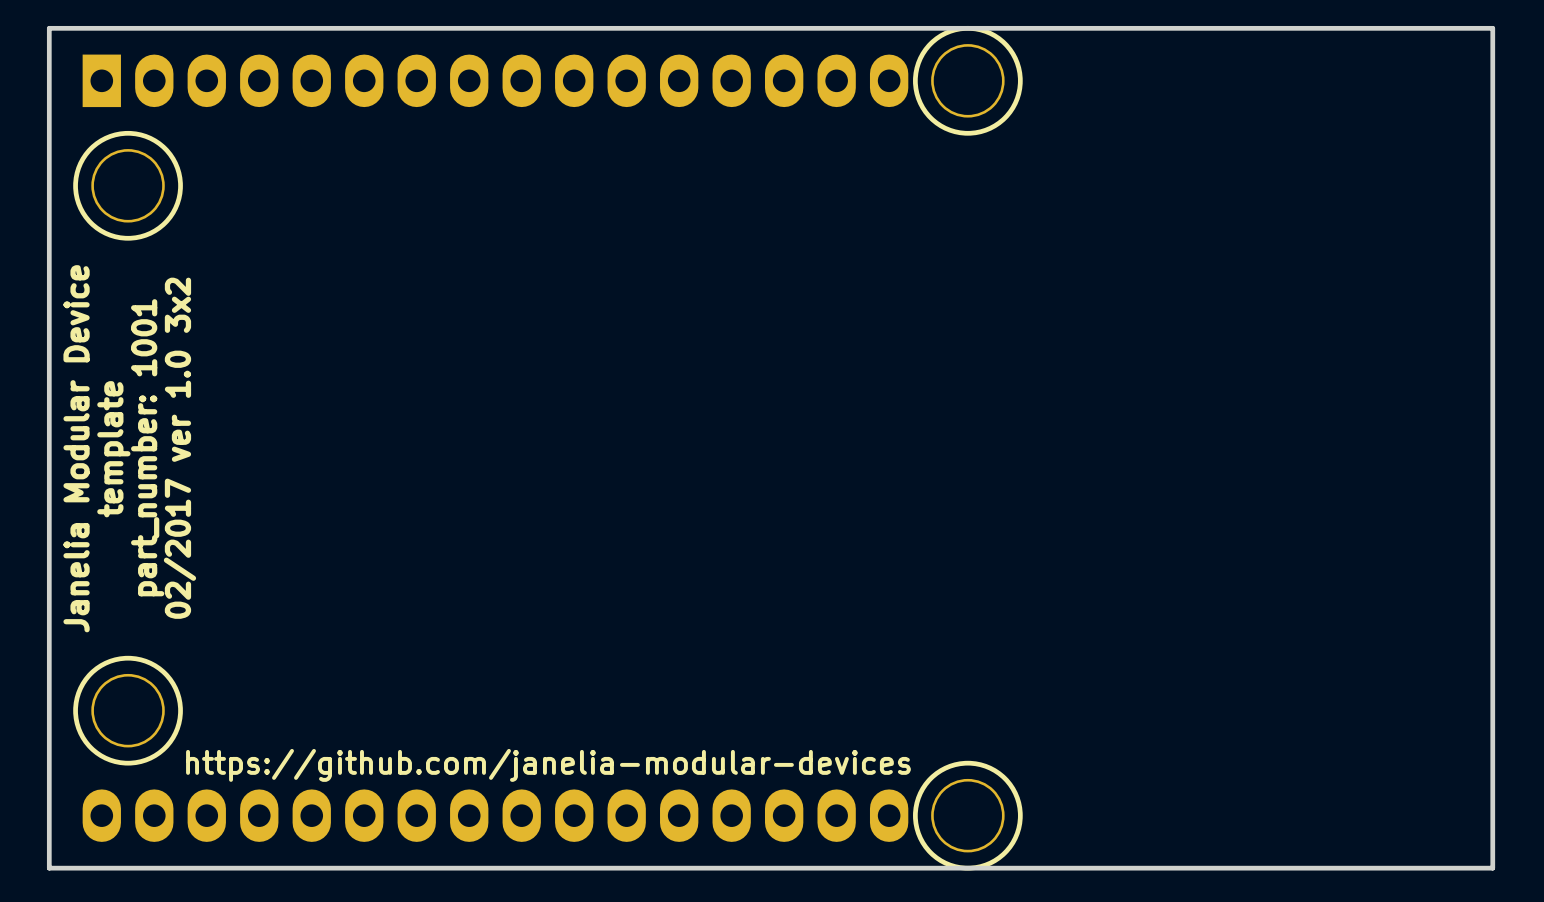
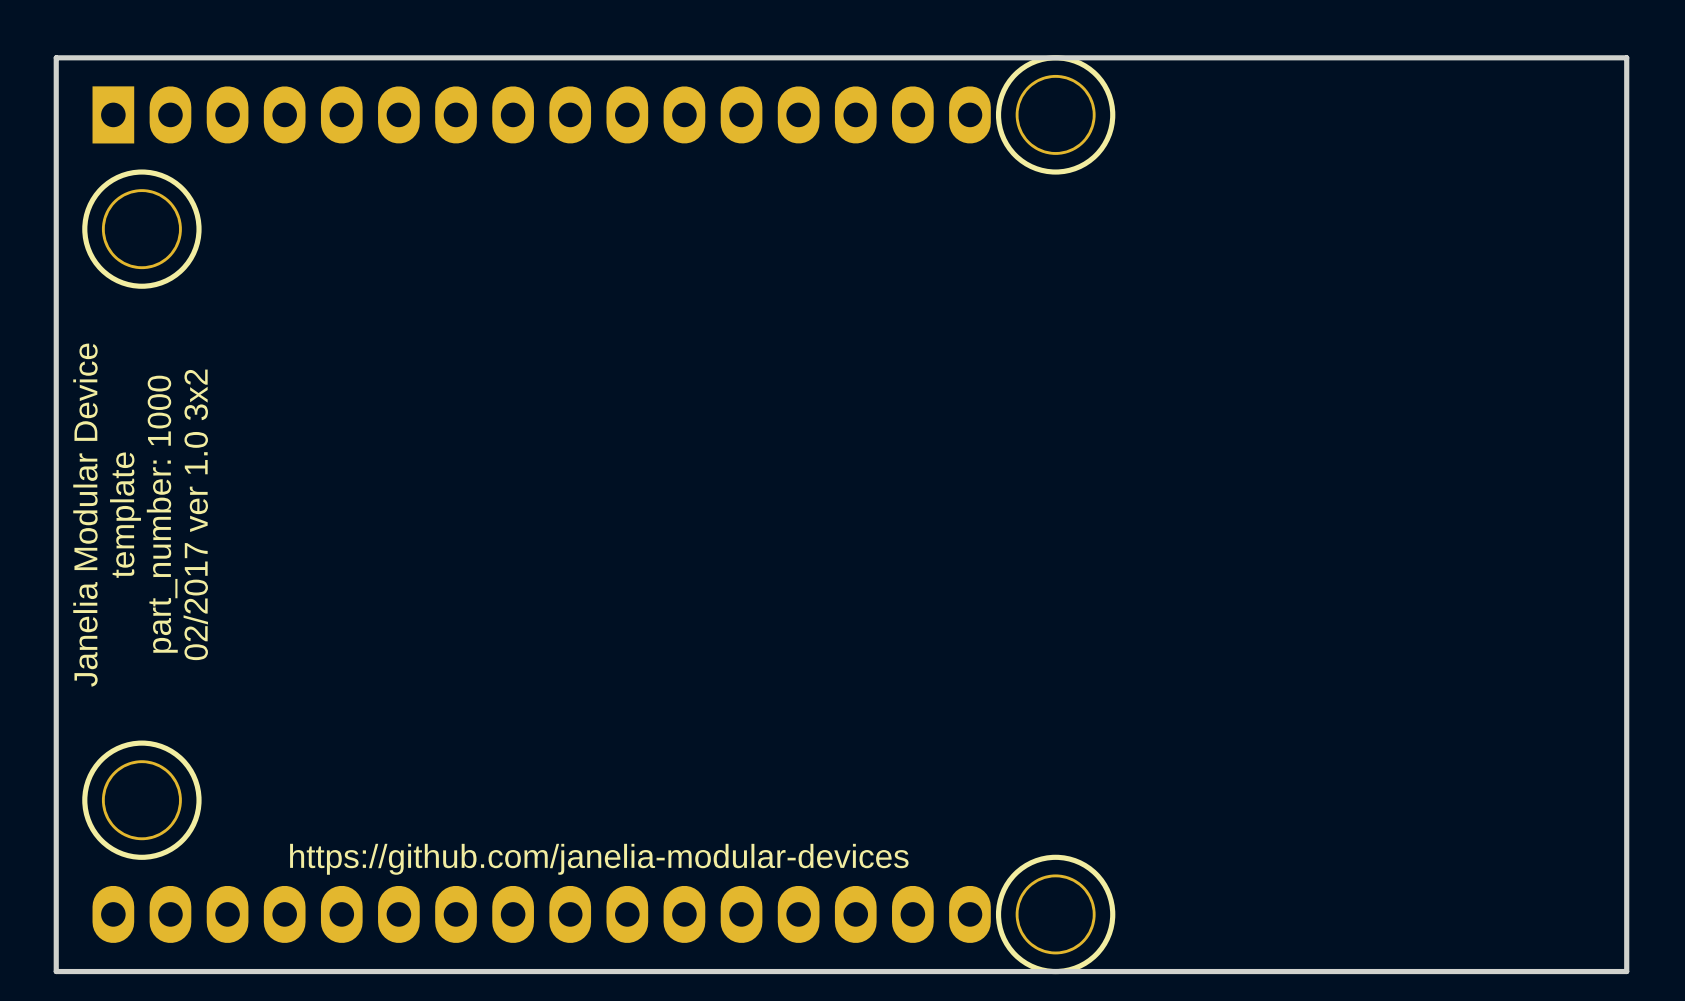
text: part_number: 1001 (147, 447) -> part_number: 1000 (162, 514)

